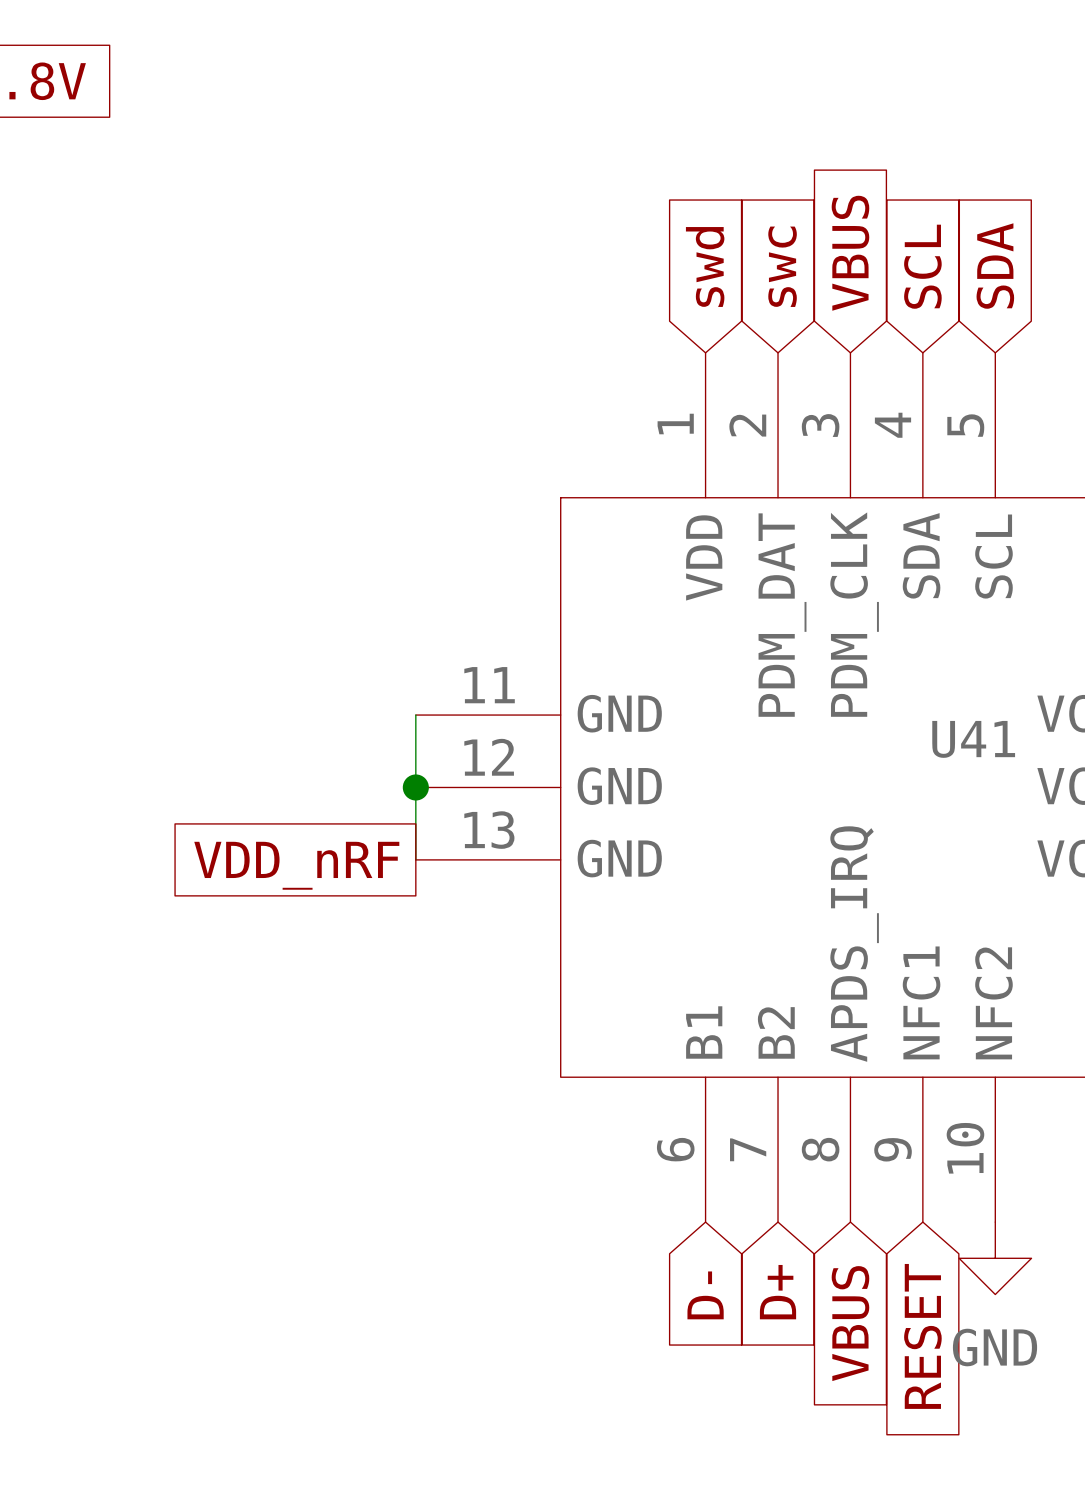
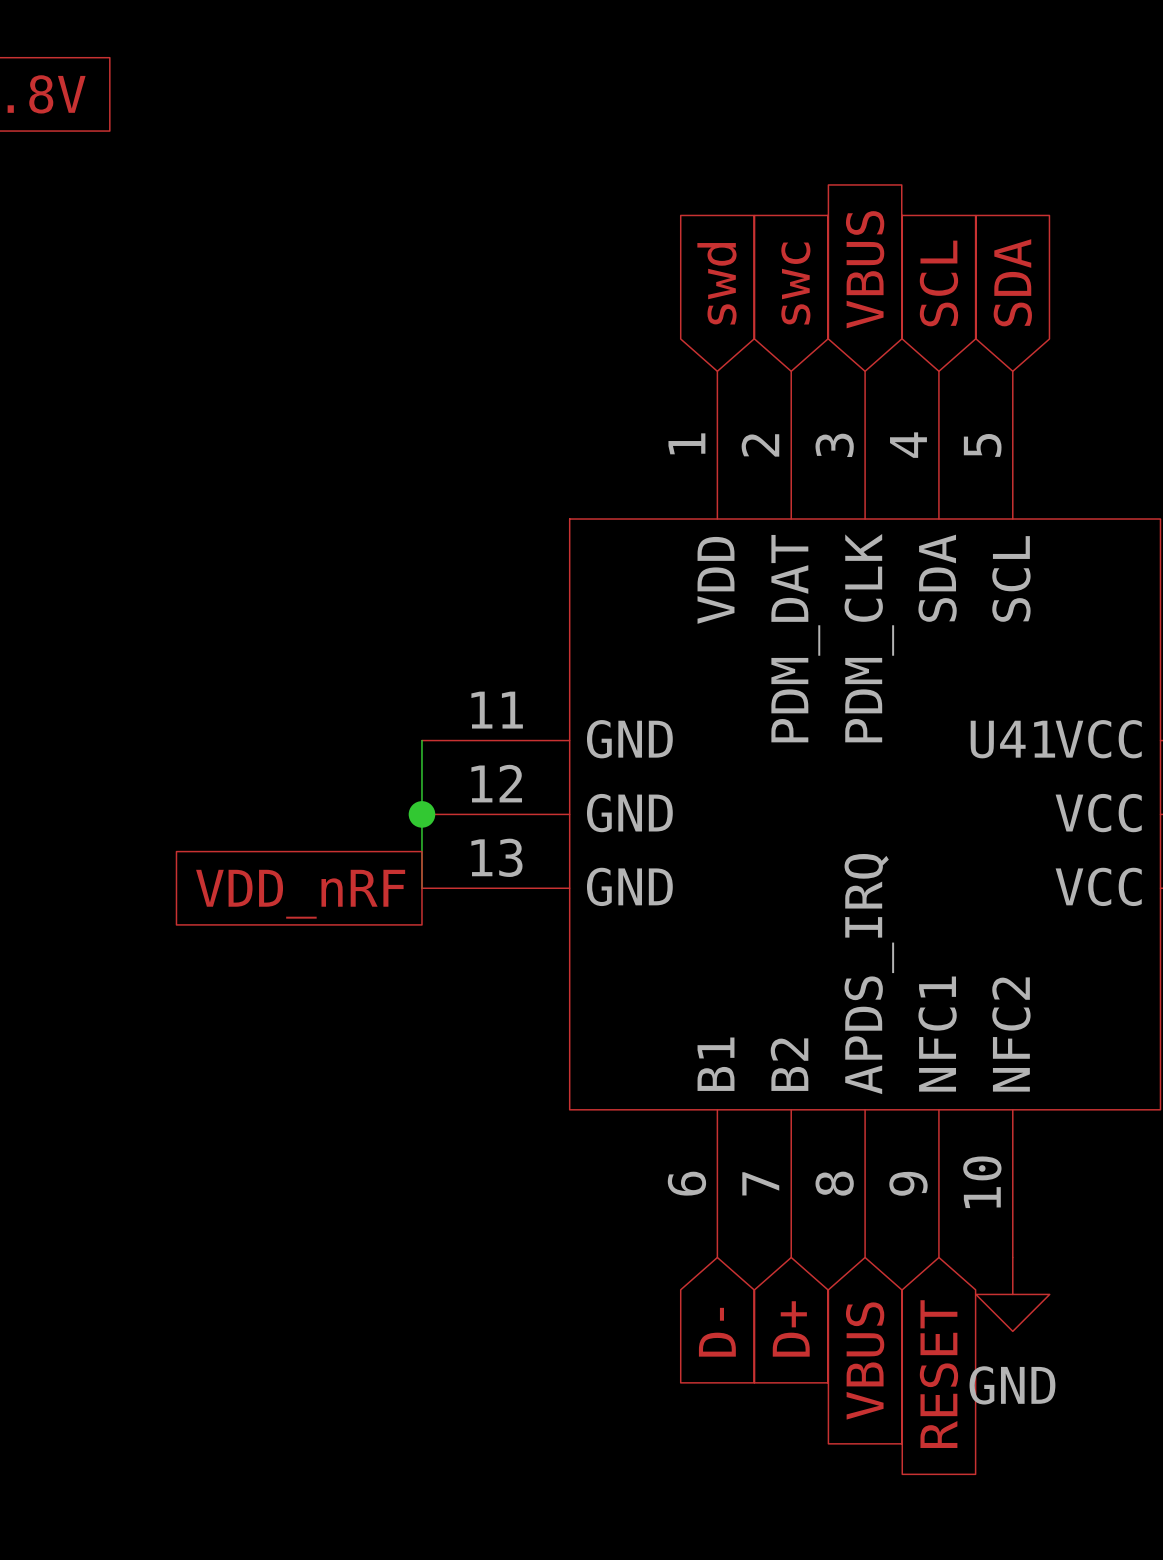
U41 name position: U41 (973, 739) -> U41 (1012, 739)

